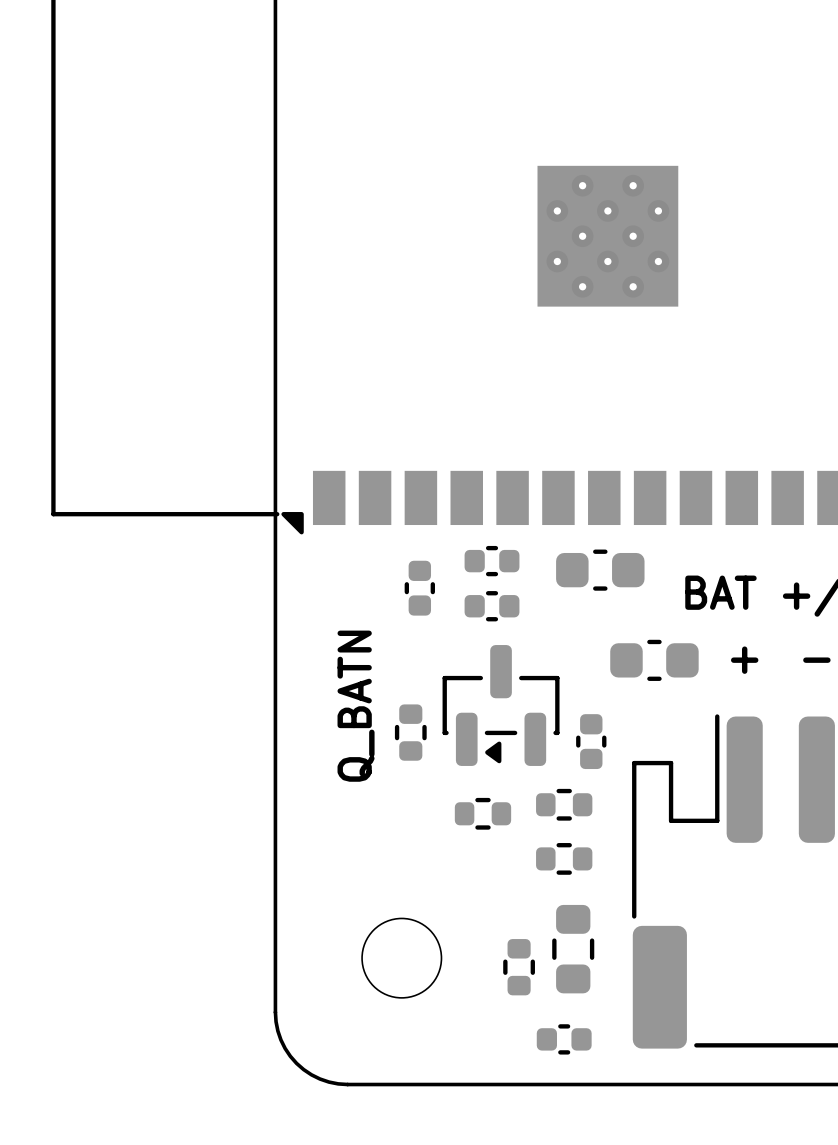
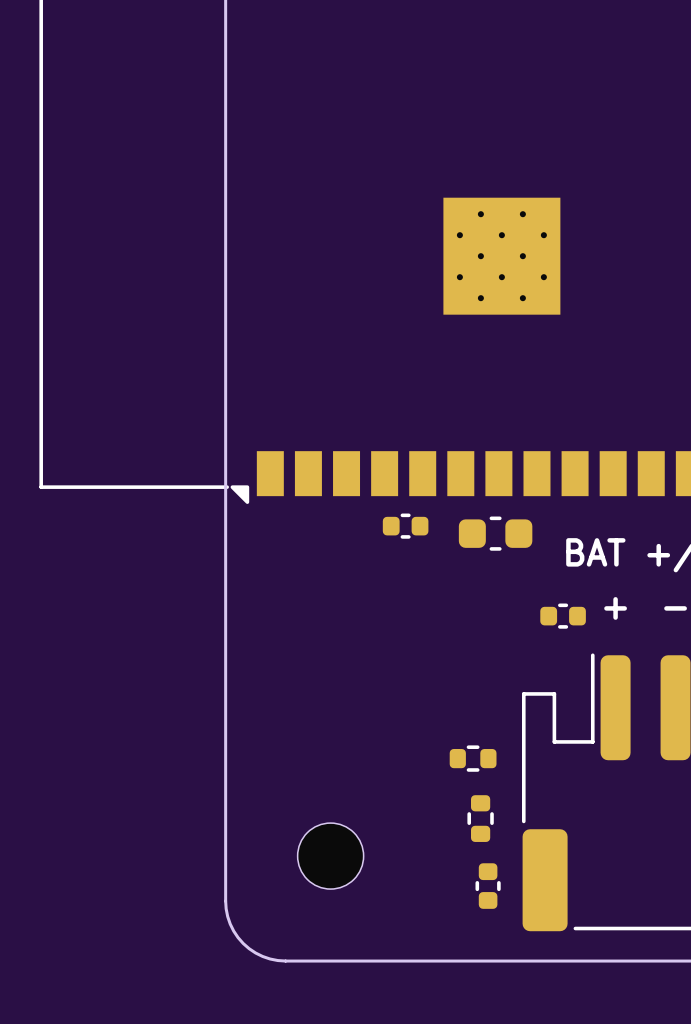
part: (419, 588) -> none
part: (492, 606) -> none
part footprint: [610, 639, 699, 681] -> [540, 603, 586, 629]
Q_BATN: (501, 705) -> none
part: (410, 732) -> none
part: (591, 741) -> none
part: (564, 804) -> none
part: (482, 813) -> none
part: none -> (473, 758)
part: (564, 858) -> none
part: none -> (480, 818)
part: (573, 949) -> none
part: (519, 967) -> none
part rotation: 0° (564, 1039) -> 90° clockwise (488, 886)
part position: (564, 1039) -> (488, 886)

